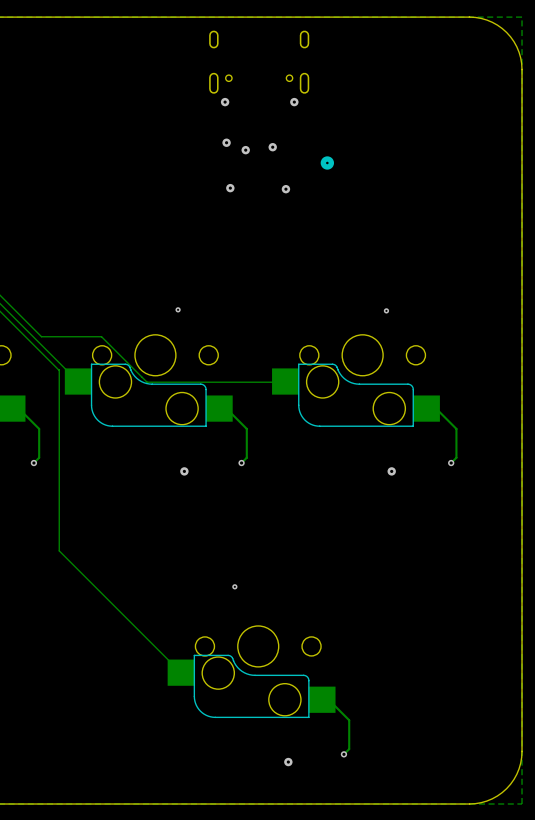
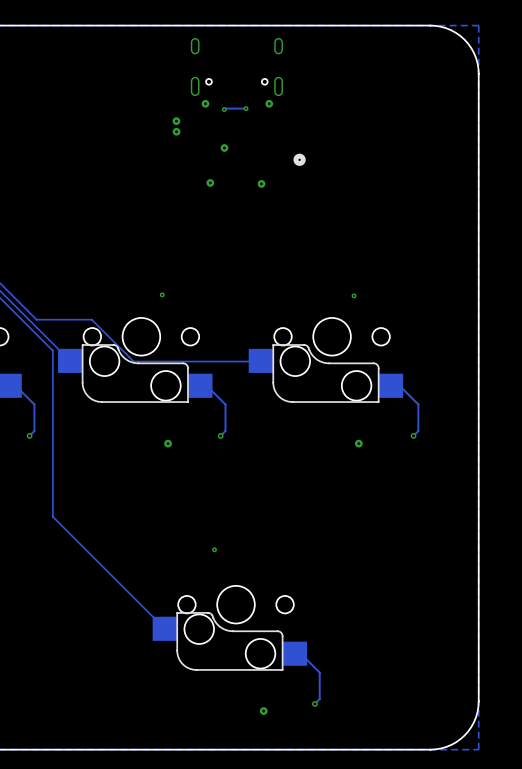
track: none -> (246, 108) (224, 109)
via: none -> (246, 108)
via: none -> (224, 109)
via: none -> (176, 121)
via: none -> (176, 131)
via: (226, 142) -> none
via: (272, 147) -> none

